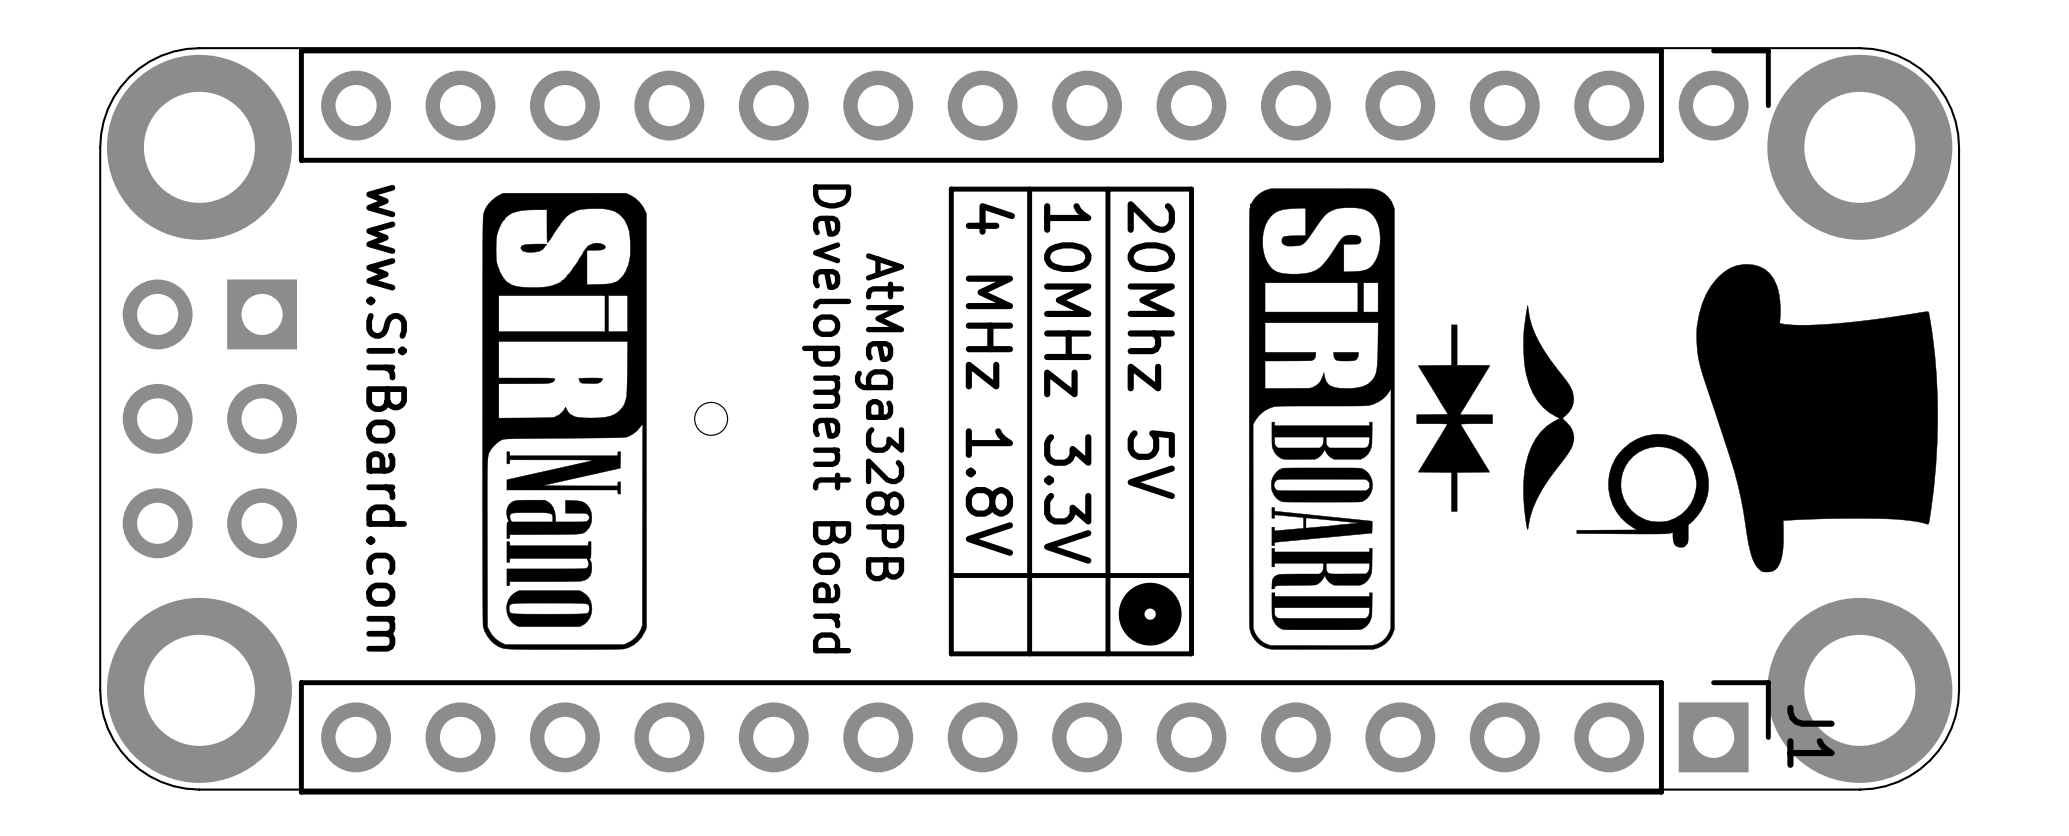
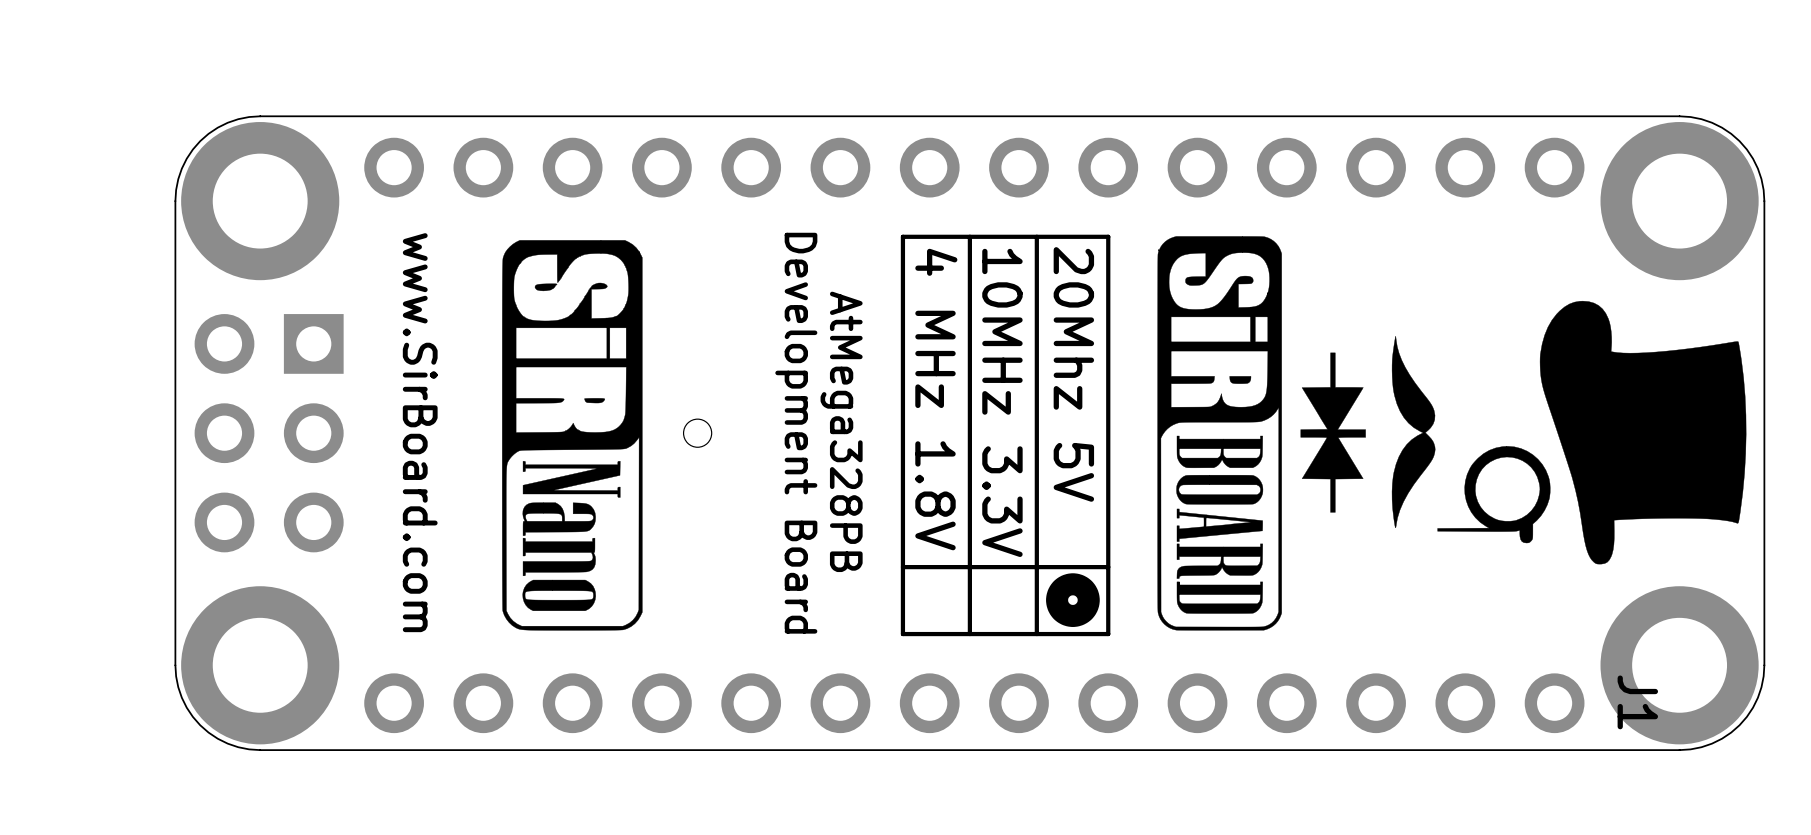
part footprint: [298, 48, 1771, 163] -> [364, 137, 1585, 198]
J1 footprint: [298, 680, 1771, 795] -> [364, 673, 1585, 734]

